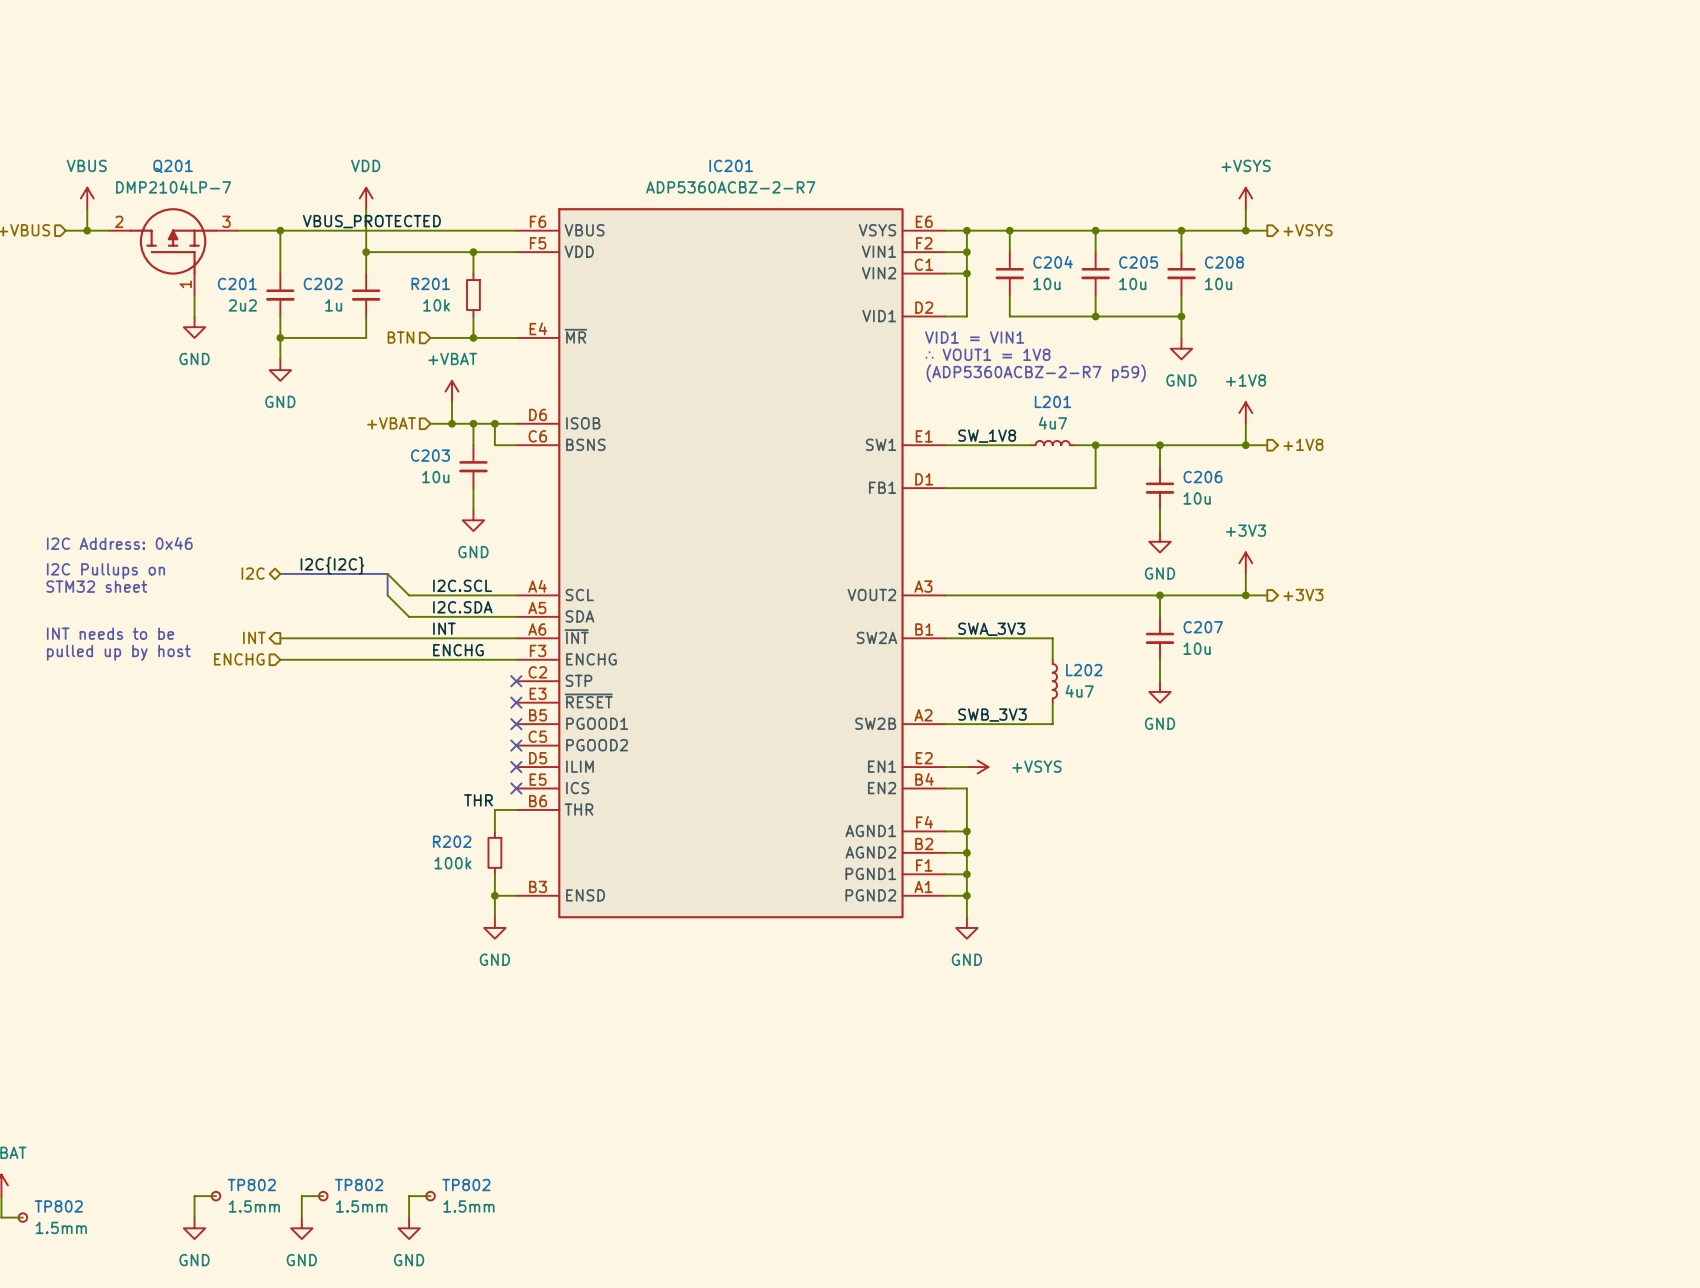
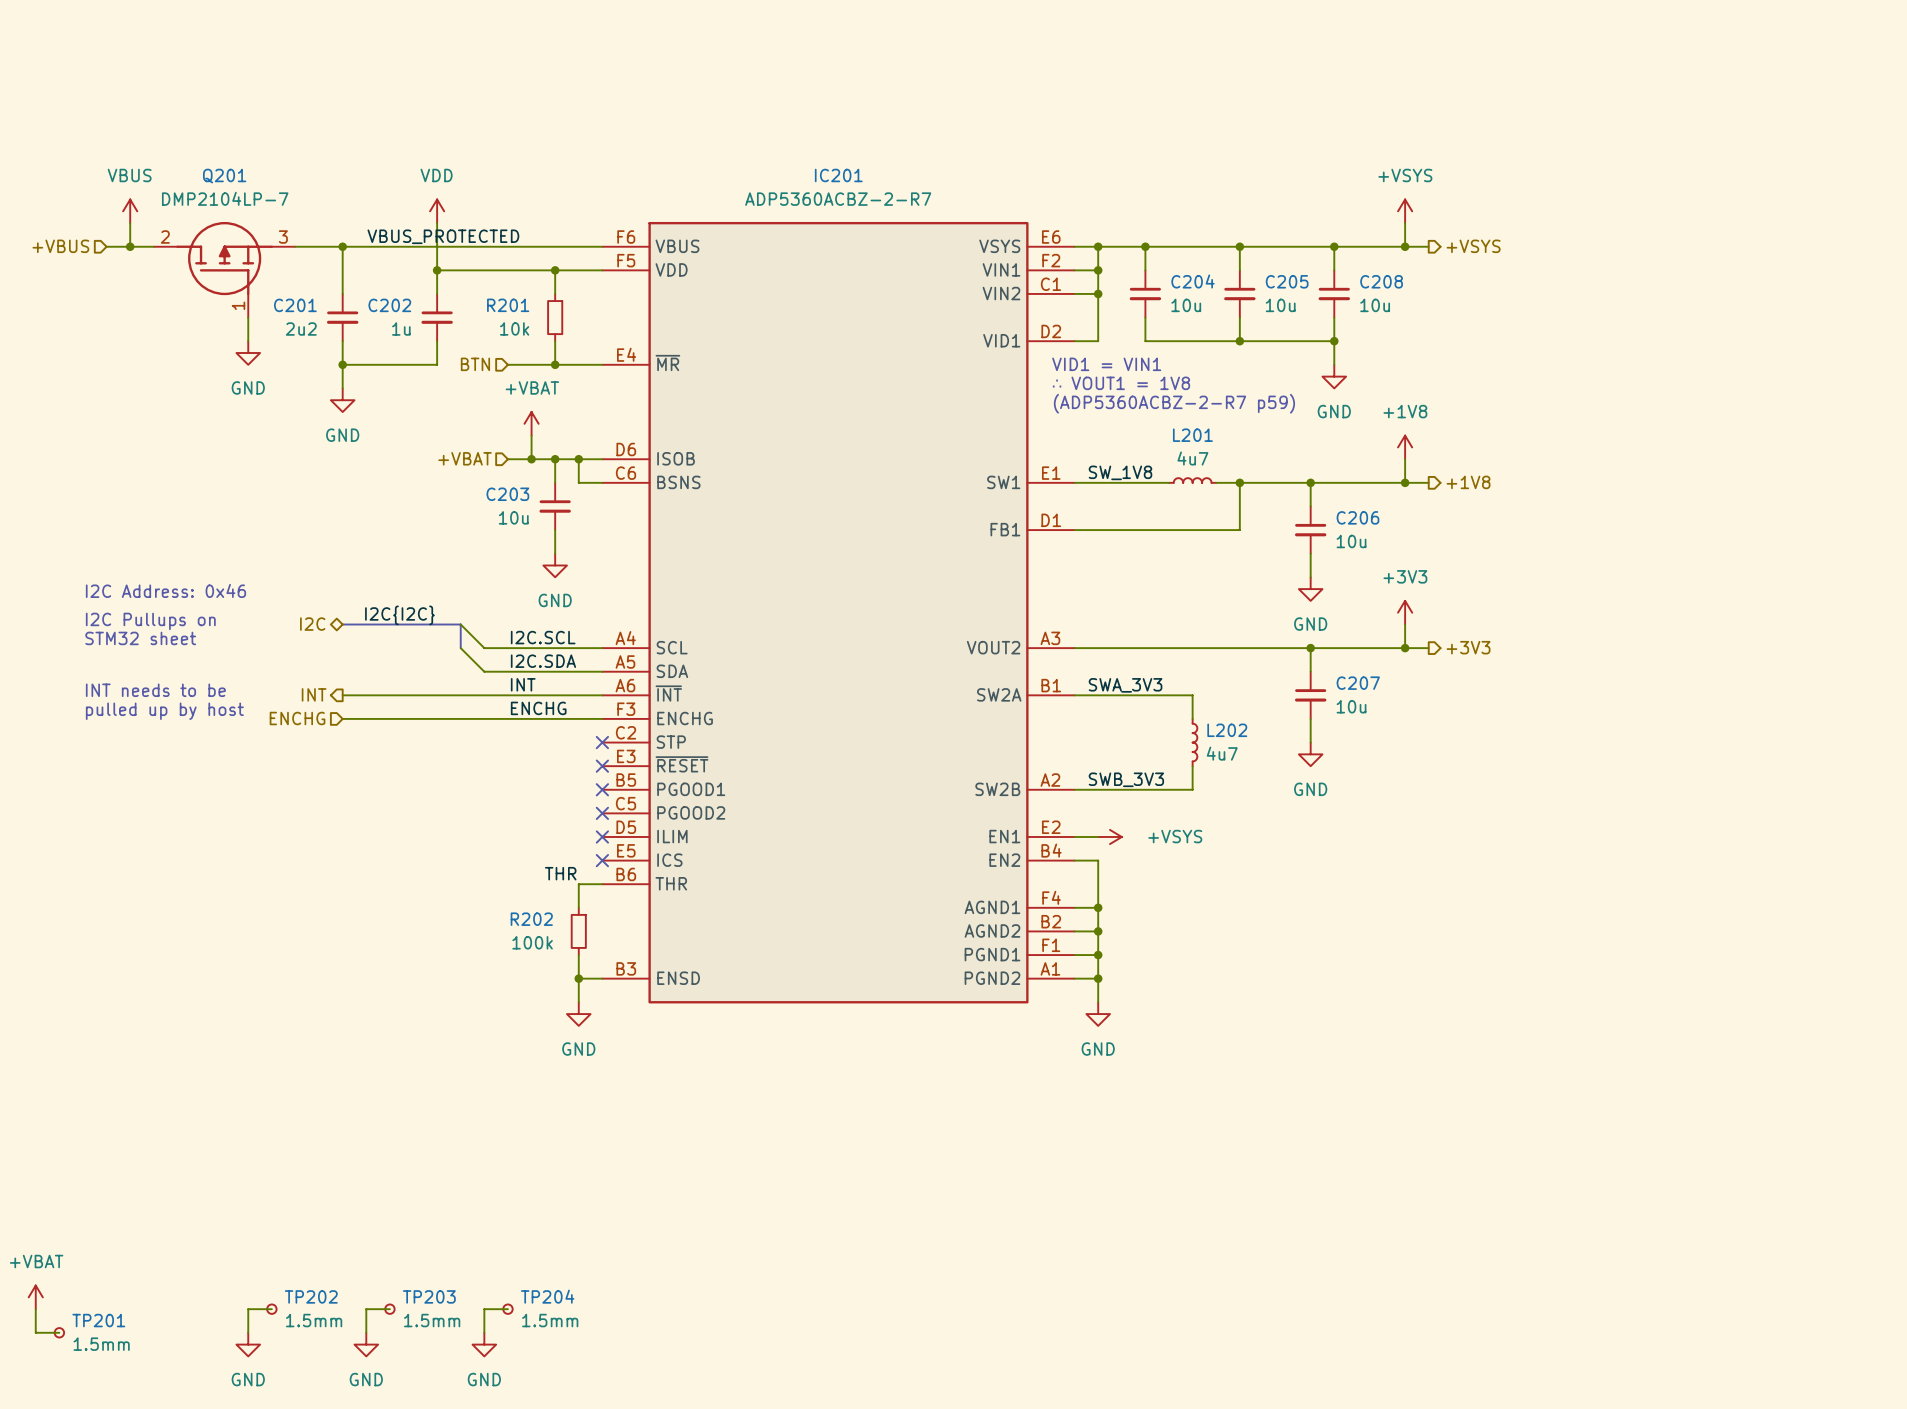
TP802 name: TP802 (251, 1185) -> TP202 (311, 1296)
TP802 name: TP802 (359, 1185) -> TP203 (429, 1296)
TP802 name: TP802 (466, 1185) -> TP204 (547, 1296)
TP802 name: TP802 (58, 1206) -> TP201 (98, 1320)

